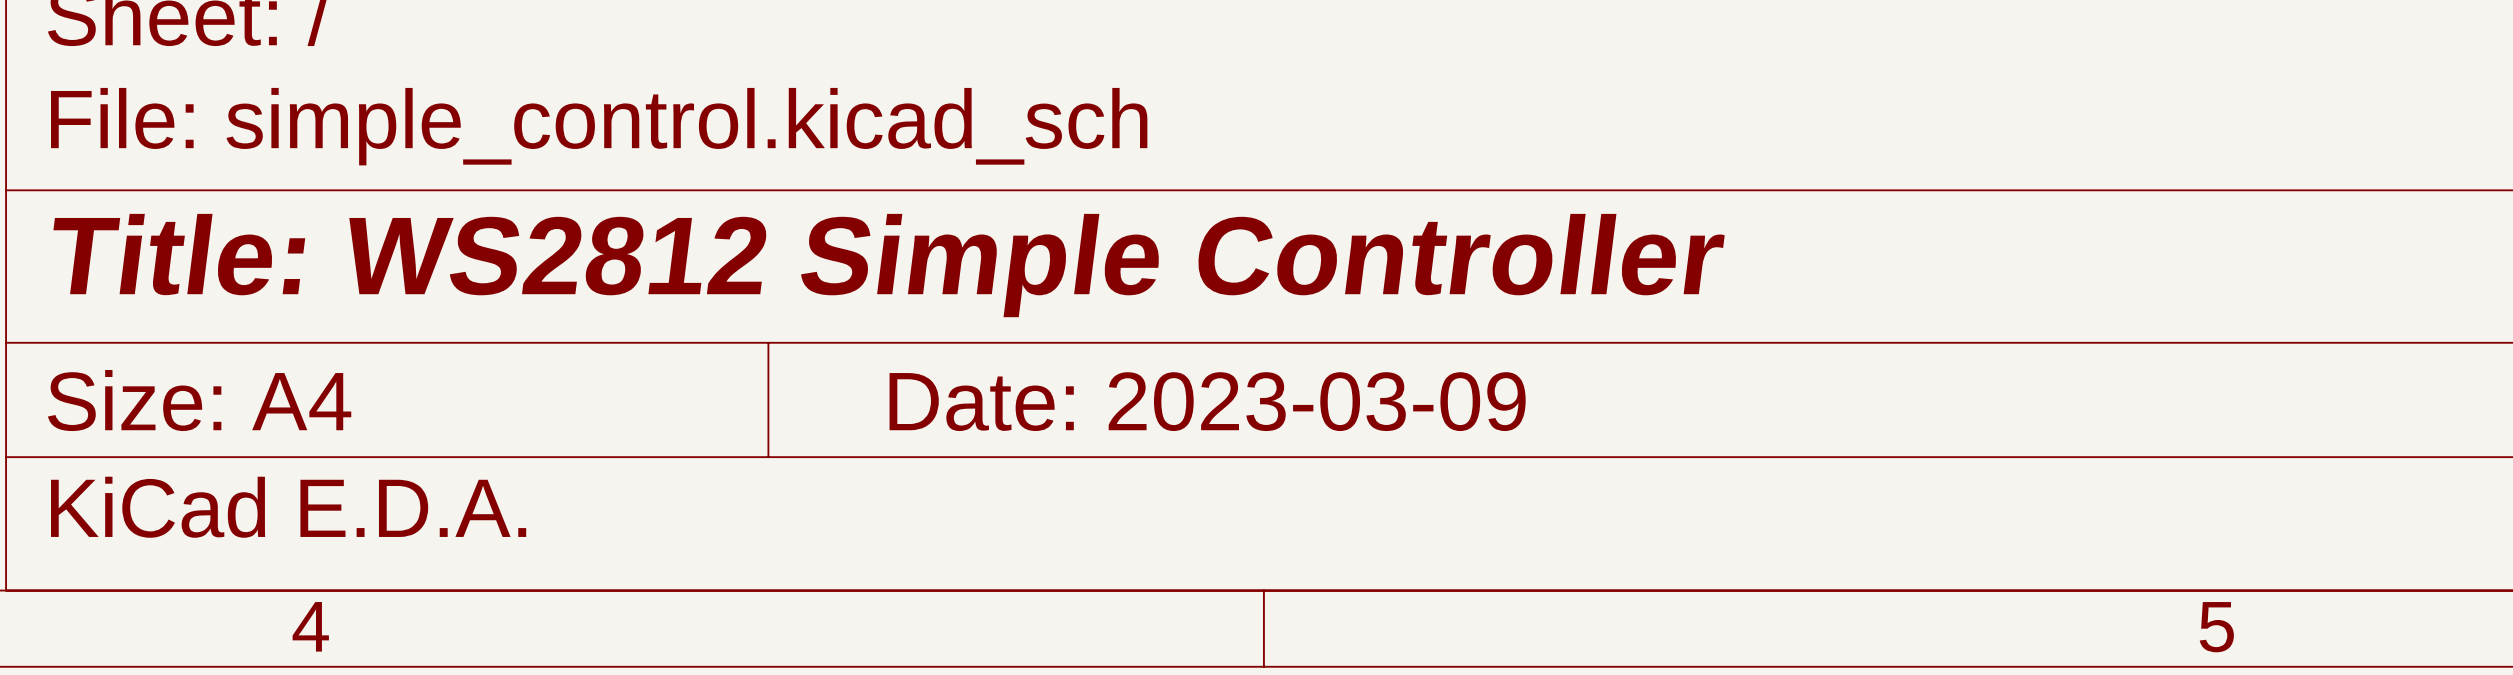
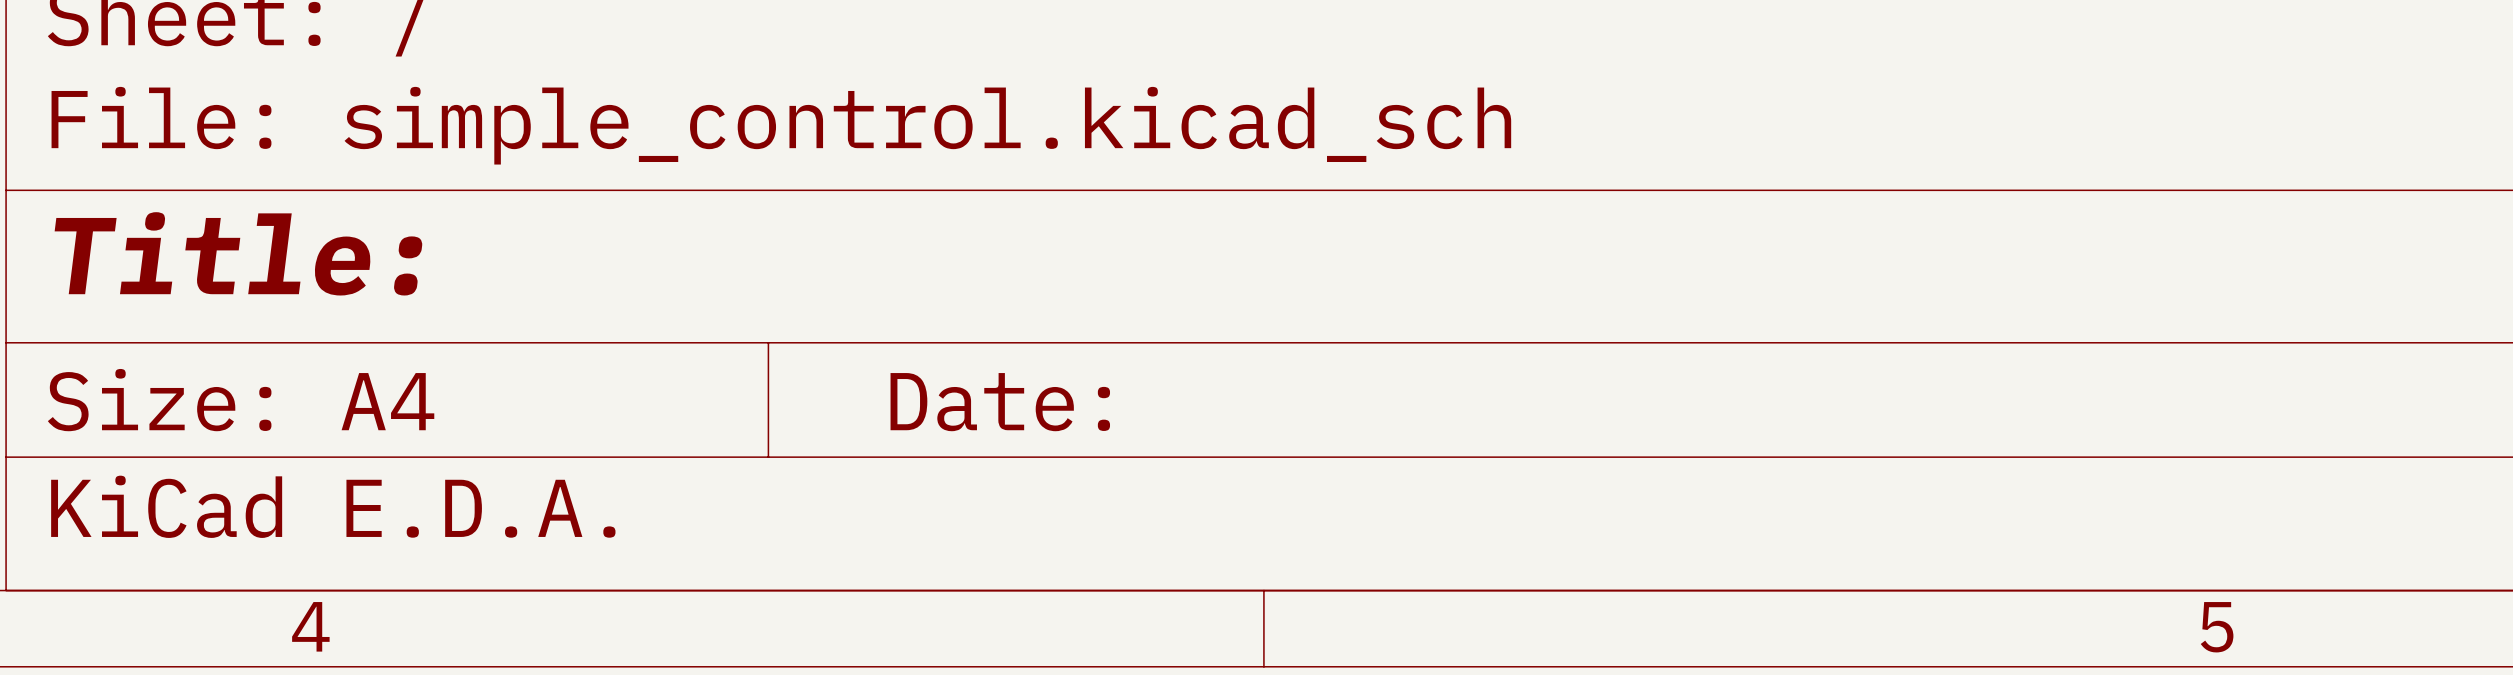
title block: Title: WS2812 Simple Controller (889, 265) -> Title: (238, 253)
title block: Date: 2023-03-09 (1207, 401) -> Date: (1000, 402)

